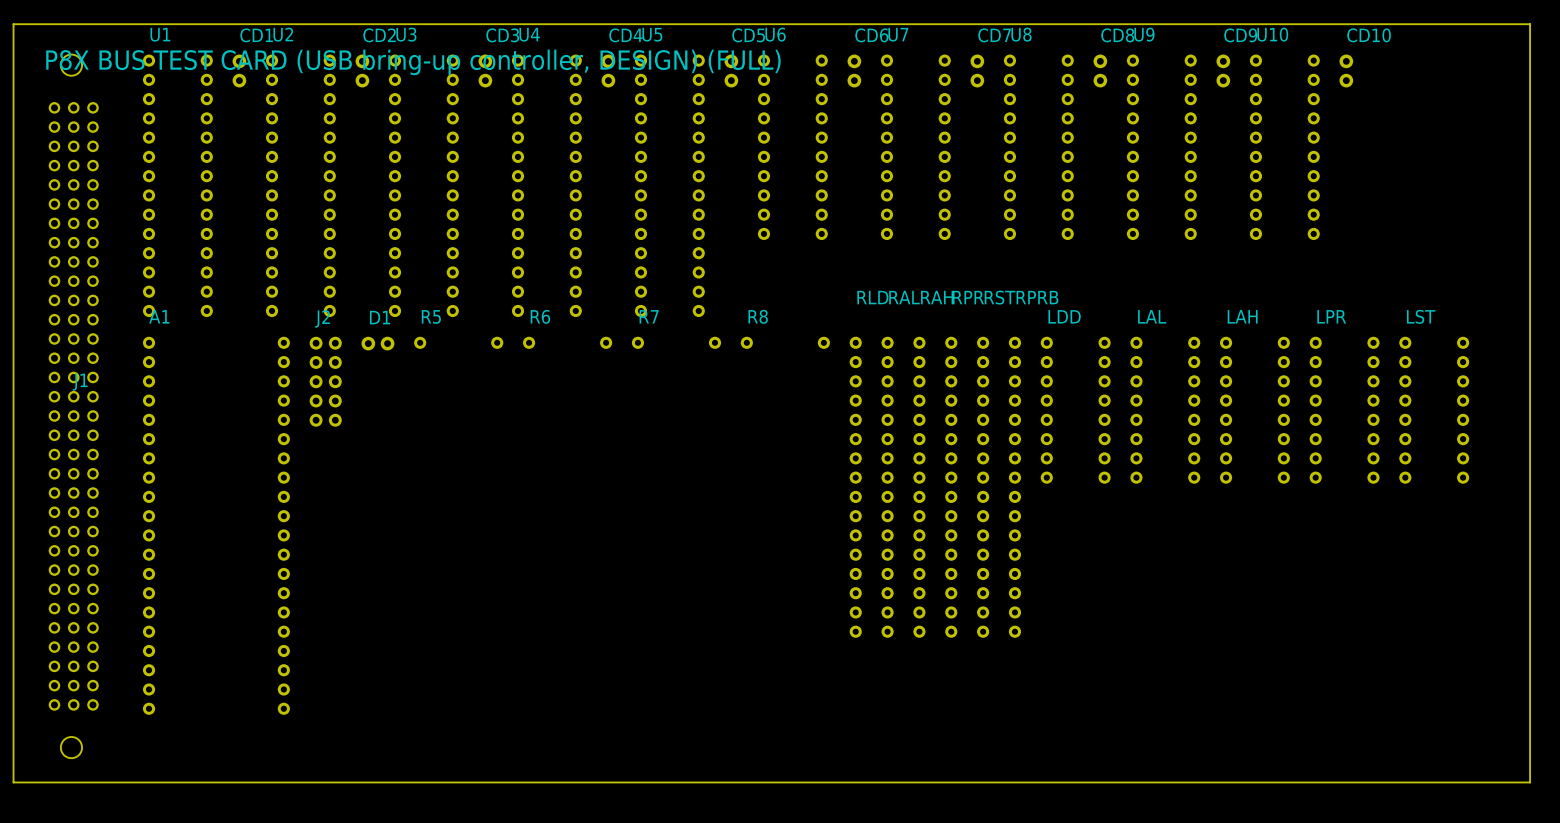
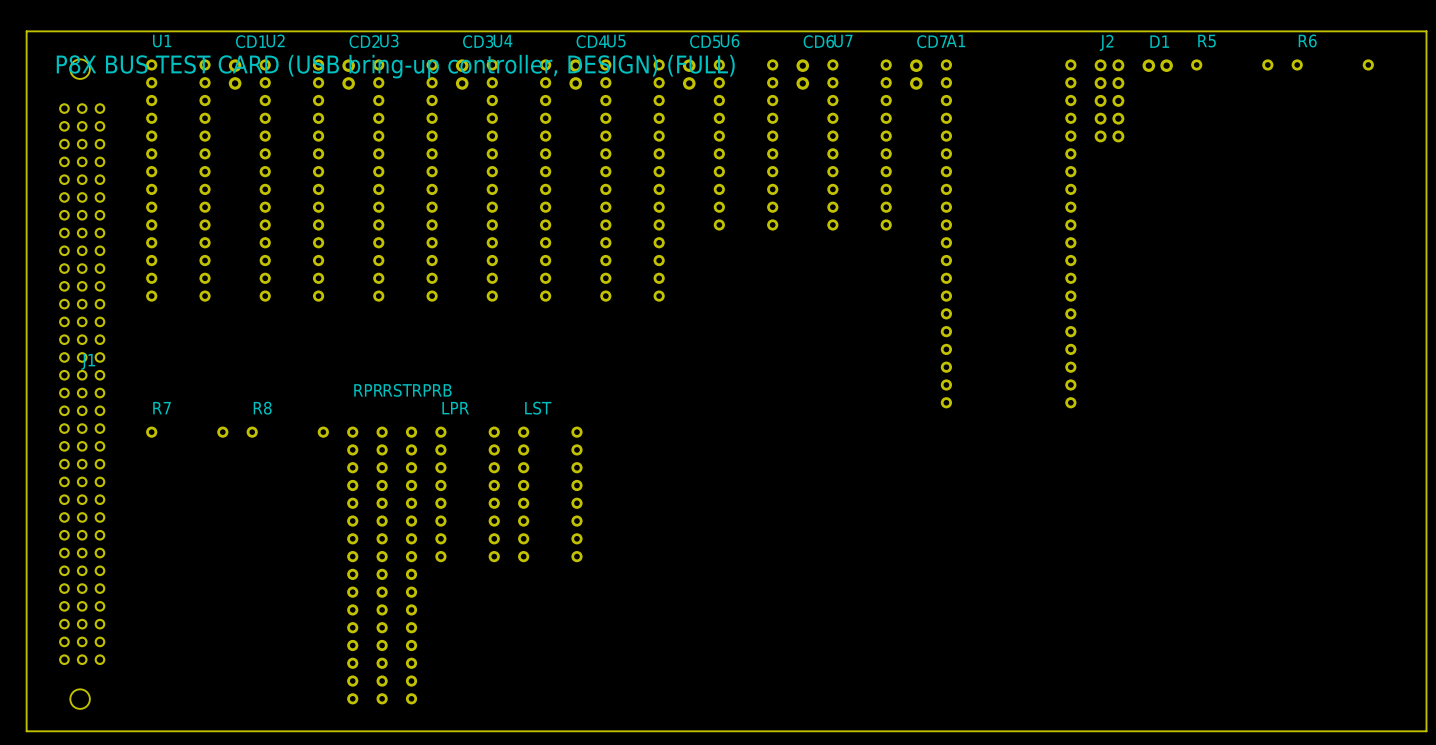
CD8: (1100, 70) -> none
CD9: (1223, 70) -> none
CD10: (1346, 70) -> none
U8: (1038, 147) -> none
U9: (1161, 147) -> none
U10: (1284, 147) -> none
R5 position: (458, 342) -> (1232, 64)
R6 position: (567, 342) -> (1332, 64)
R7 position: (676, 342) -> (187, 432)
R8 position: (785, 342) -> (287, 432)
D1 position: (377, 343) -> (1157, 65)
J2 position: (325, 381) -> (1109, 100)
LDD: (1075, 410) -> none
LAL: (1165, 410) -> none
LAH: (1254, 410) -> none
LPR: (1344, 410) -> none
LST: (1434, 410) -> none
RLD: (855, 487) -> none
RAL: (887, 487) -> none
RAH: (919, 487) -> none
RPR: (951, 487) -> none
RST: (983, 487) -> none
RPRB: (1014, 487) -> none
A1 position: (216, 525) -> (1008, 233)
LPR: none -> (467, 494)
LST: none -> (550, 494)
RPR: none -> (352, 565)
RST: none -> (382, 565)
RPRB: none -> (411, 565)

